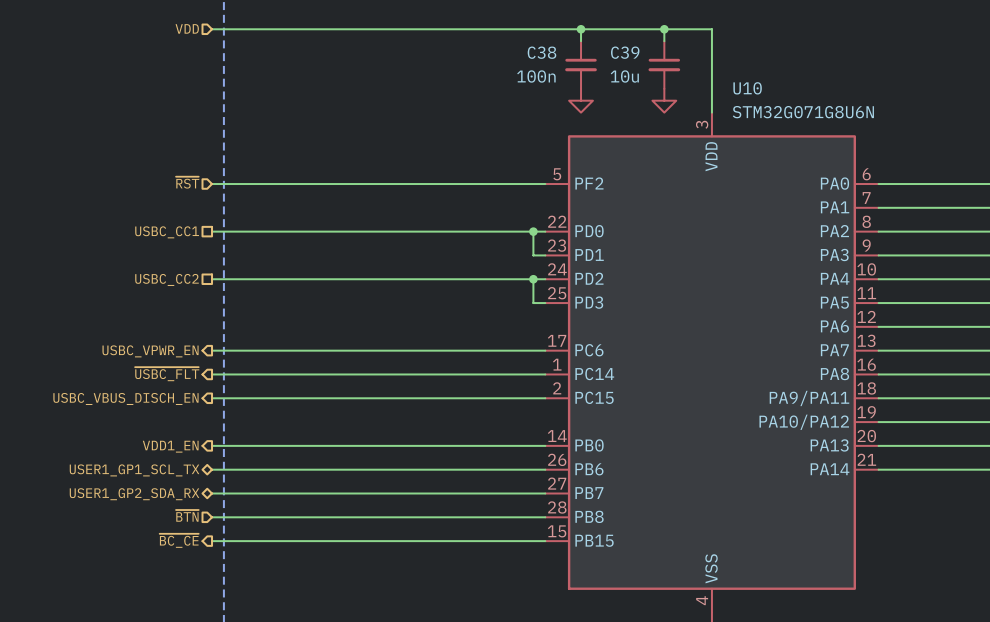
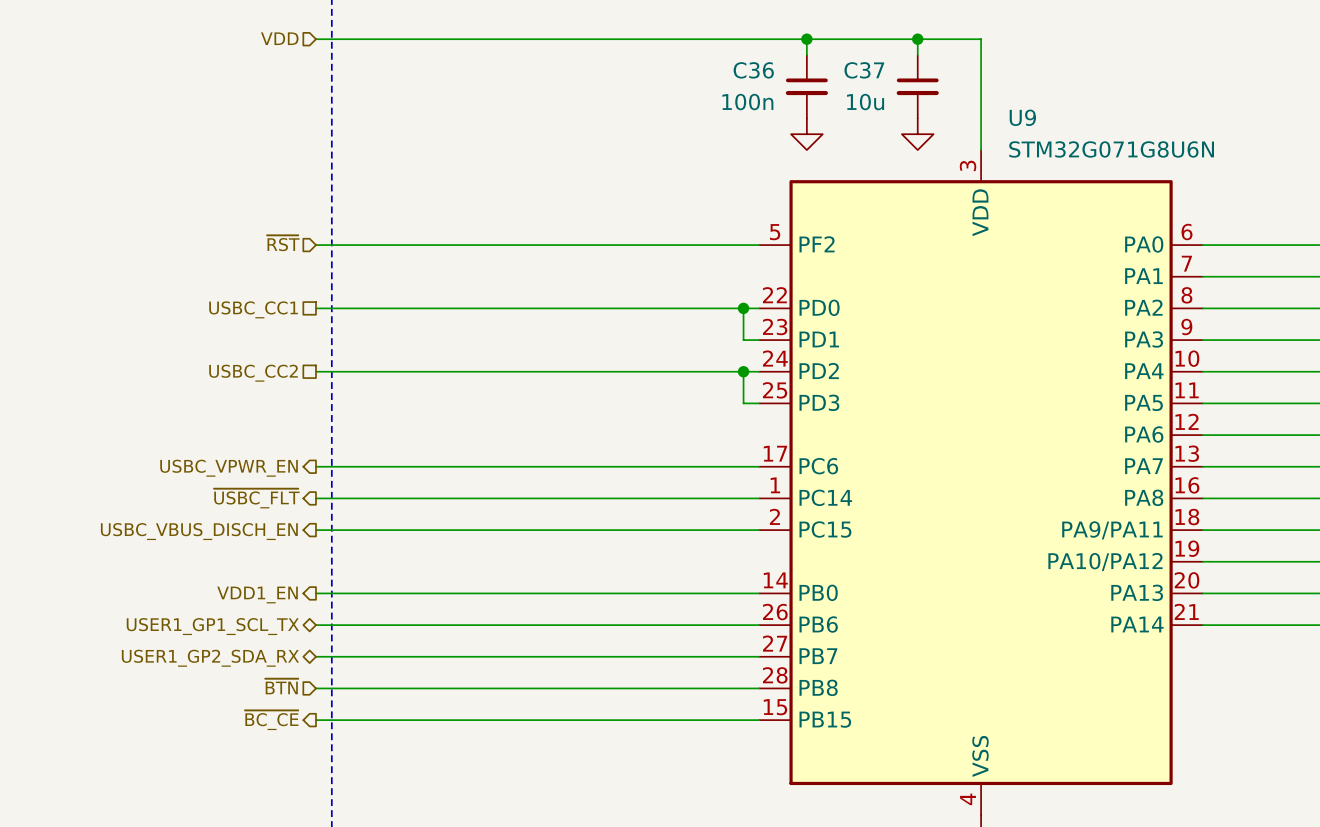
C38 name: C38 (541, 52) -> C36 (753, 70)
C39 name: C39 (625, 52) -> C37 (864, 70)
U10 name: U10 (747, 88) -> U9 (1022, 117)

